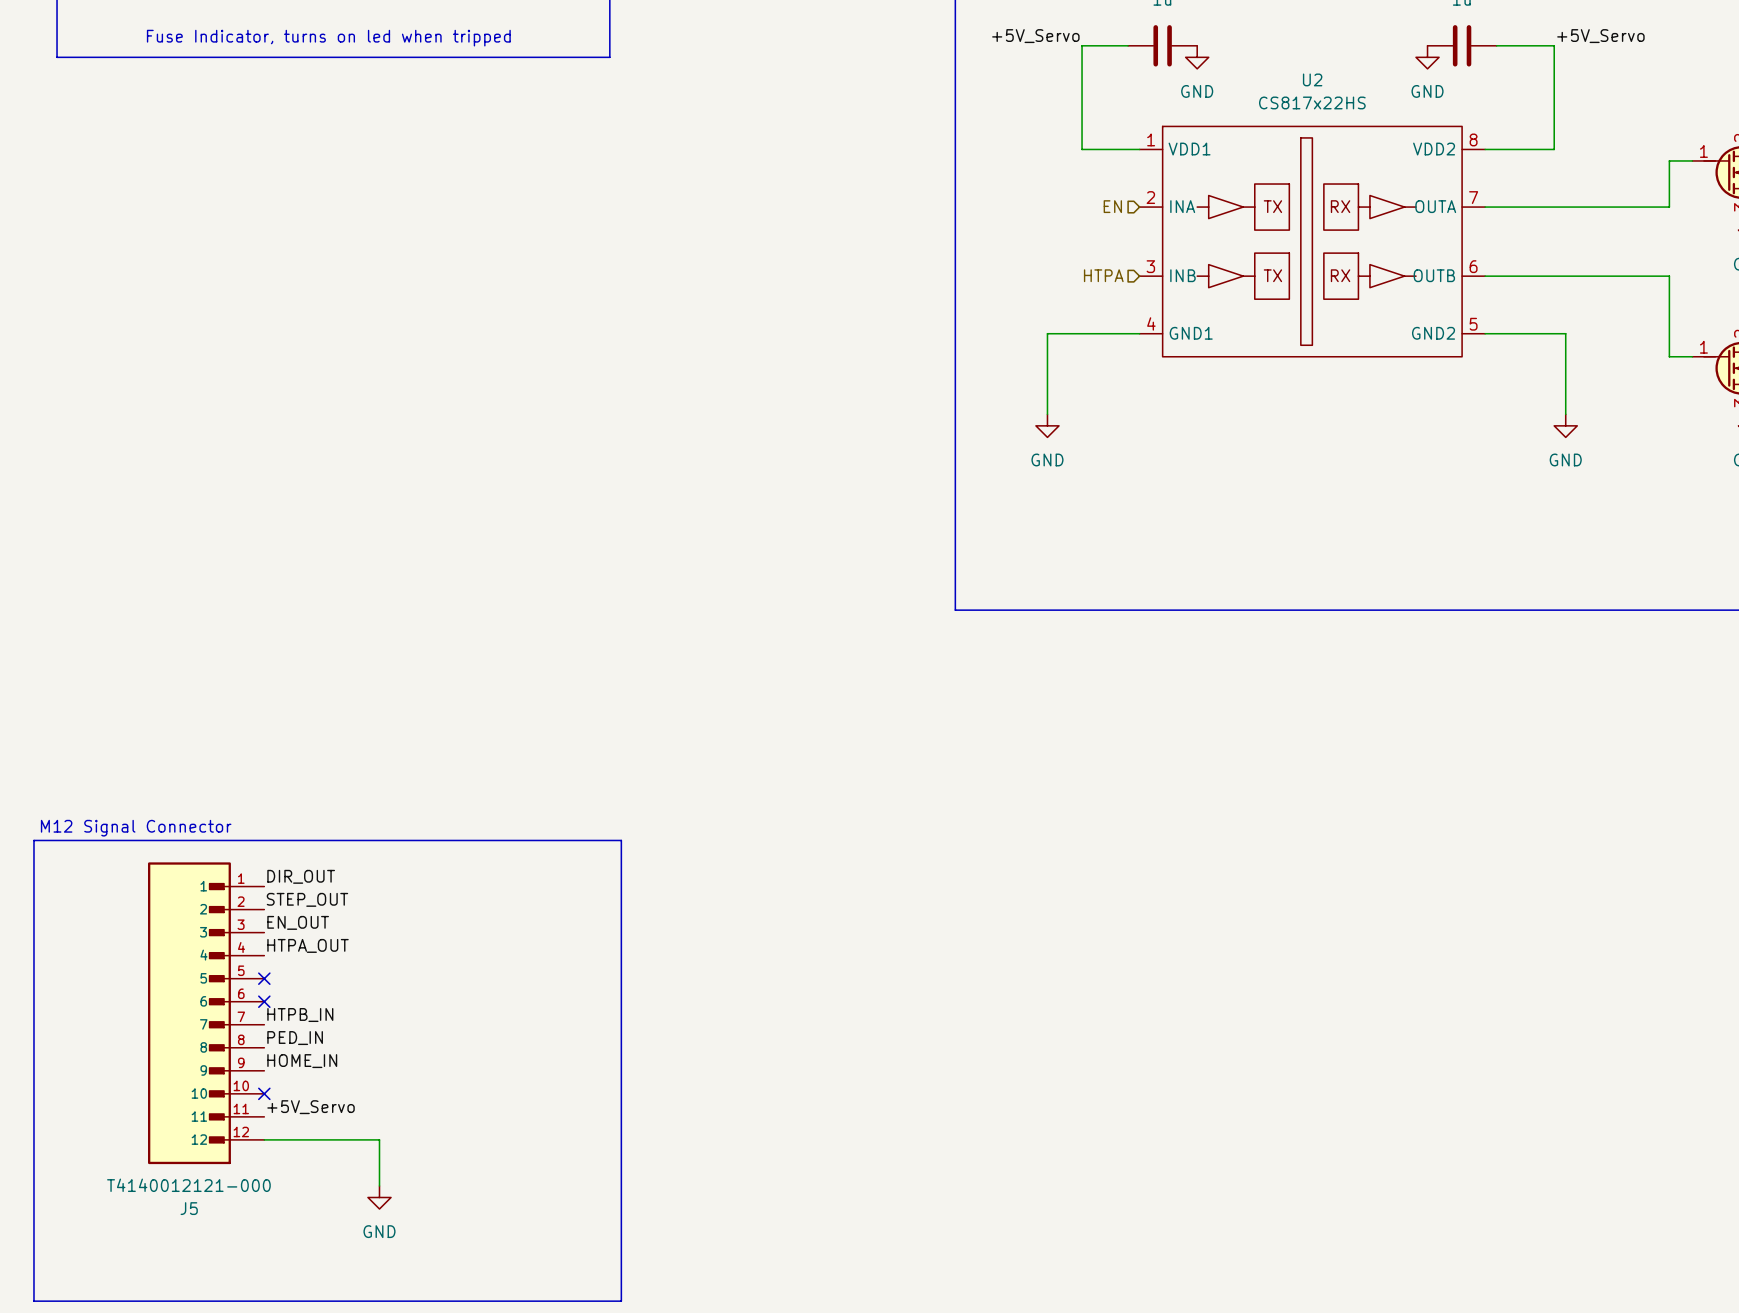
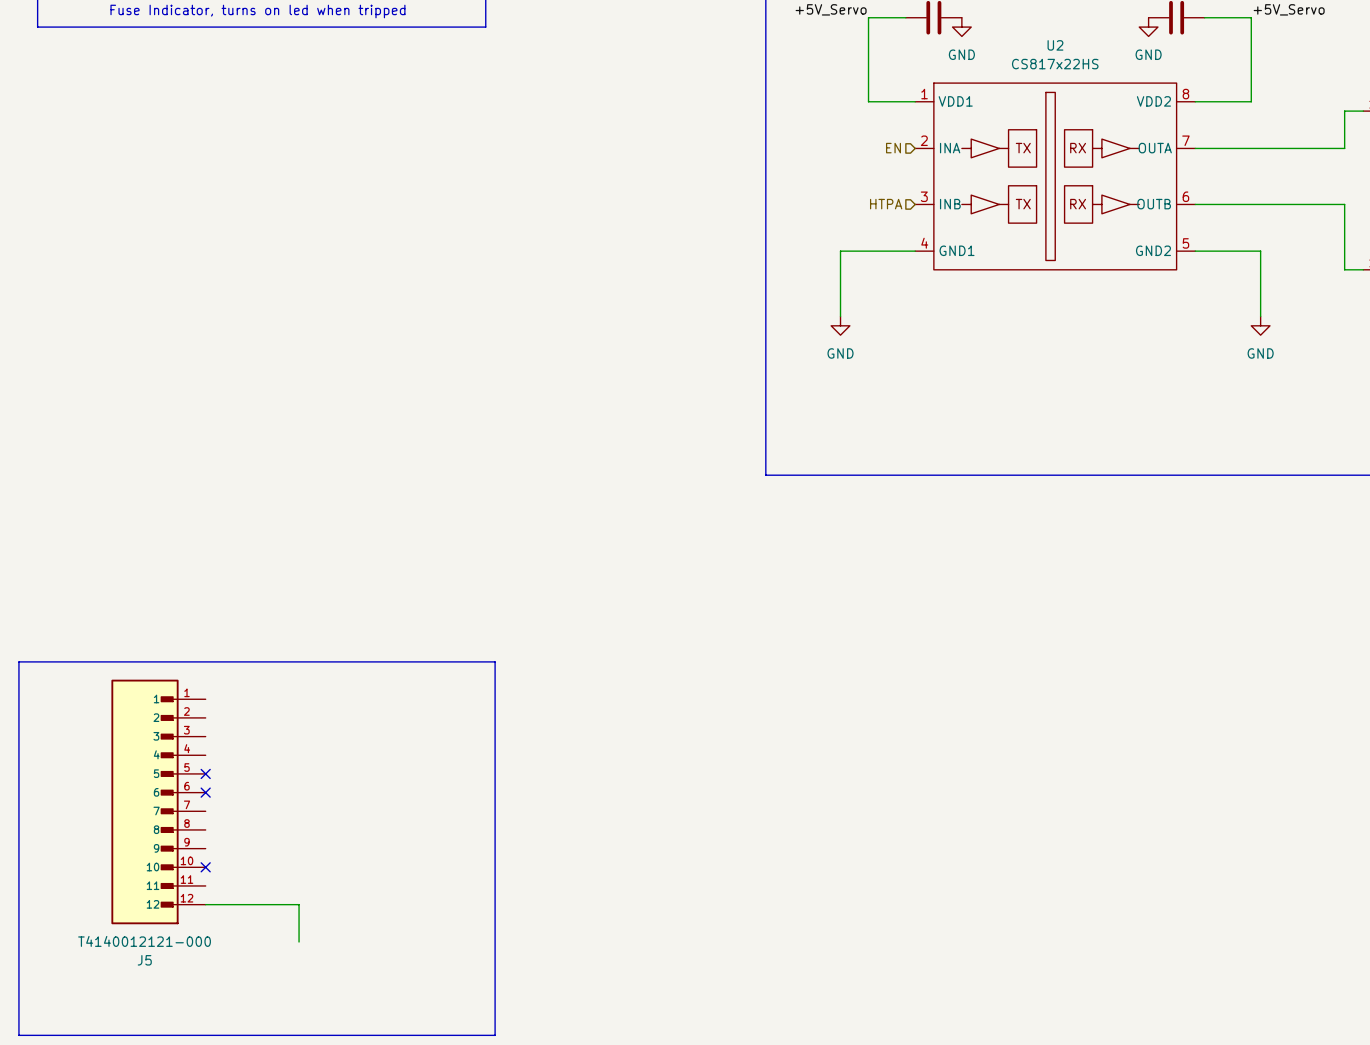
text: M12 Signal Connector (136, 828) -> none
label: DIR_OUT (301, 876) -> none
label: STEP_OUT (307, 899) -> none
label: EN_OUT (298, 922) -> none
label: HTPA_OUT (308, 945) -> none
label: HTPB_IN (300, 1015) -> none
label: PED_IN (295, 1038) -> none
label: HOME_IN (302, 1061) -> none
label: +5V_Servo (311, 1107) -> none
power symbol: GND (379, 1197) -> none

